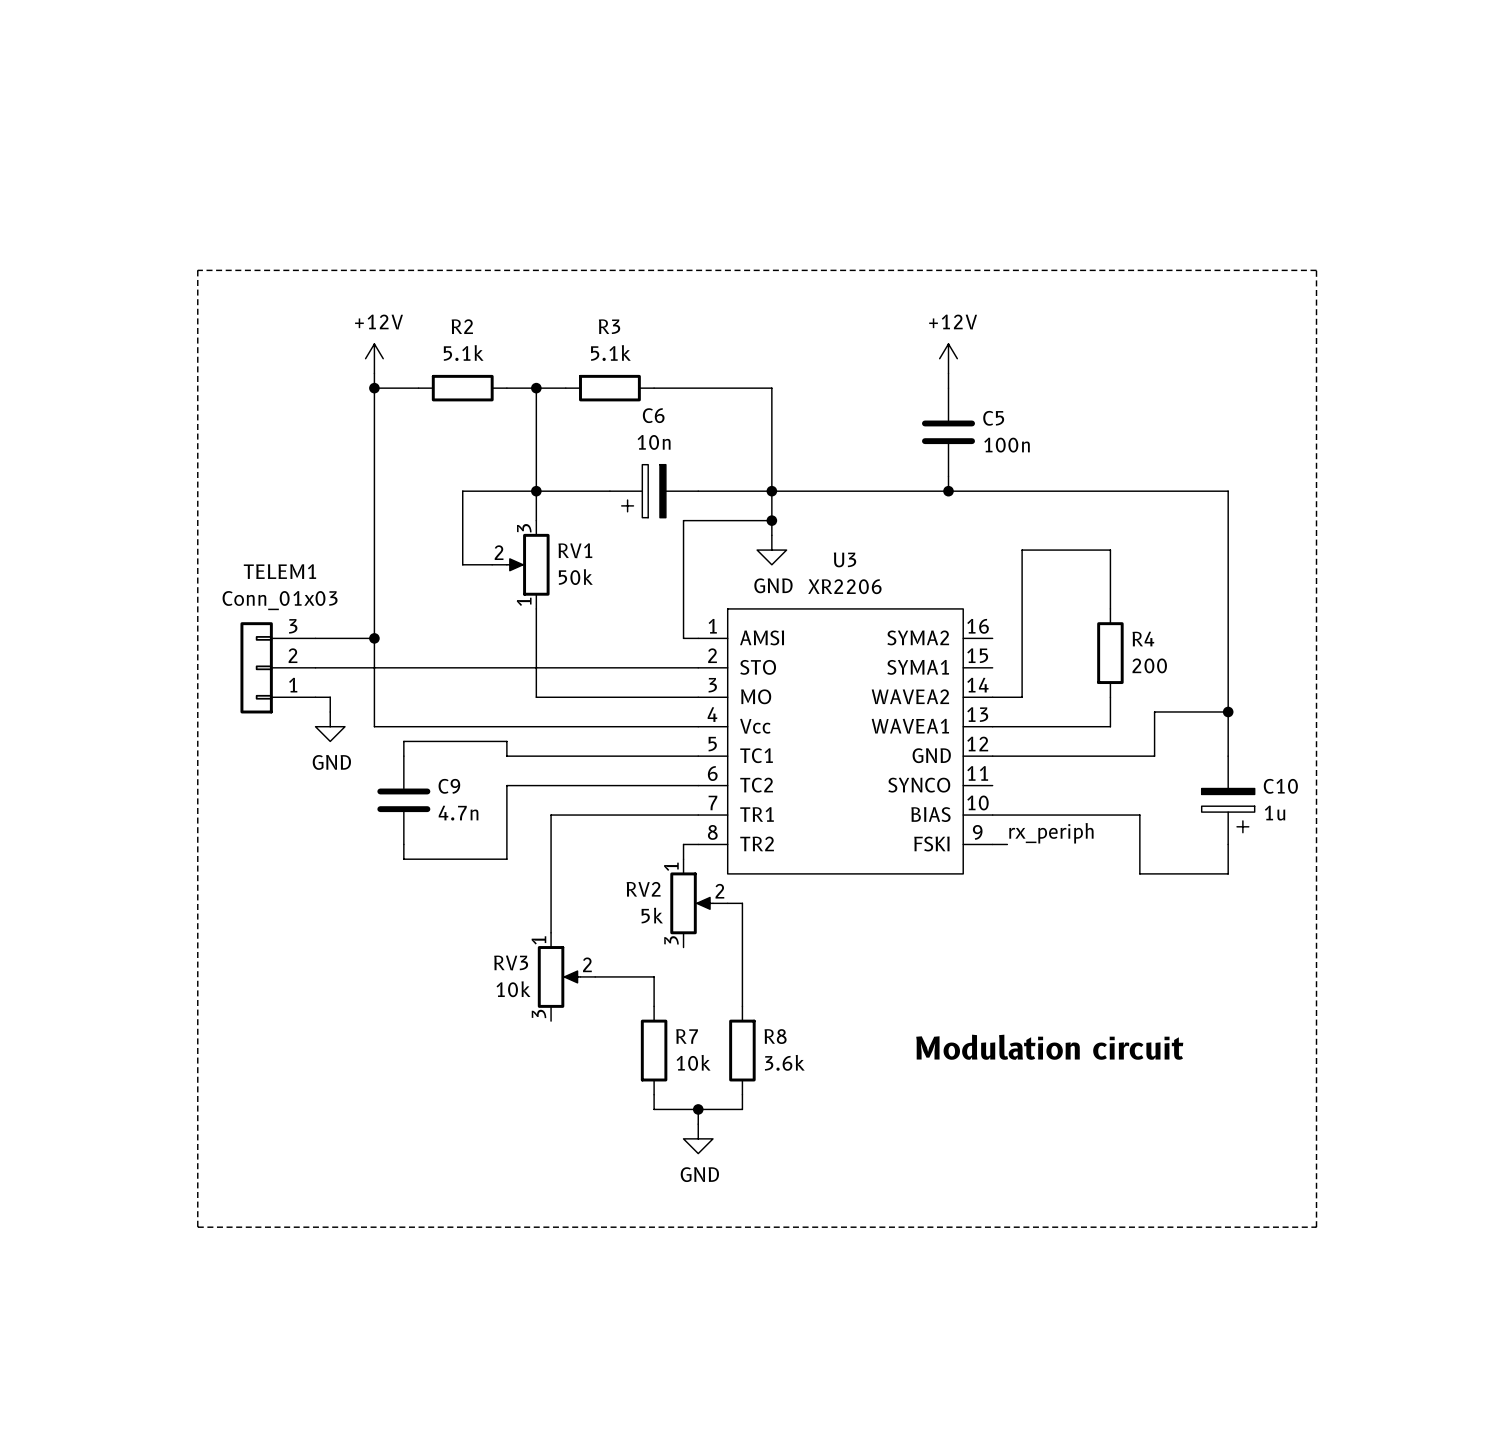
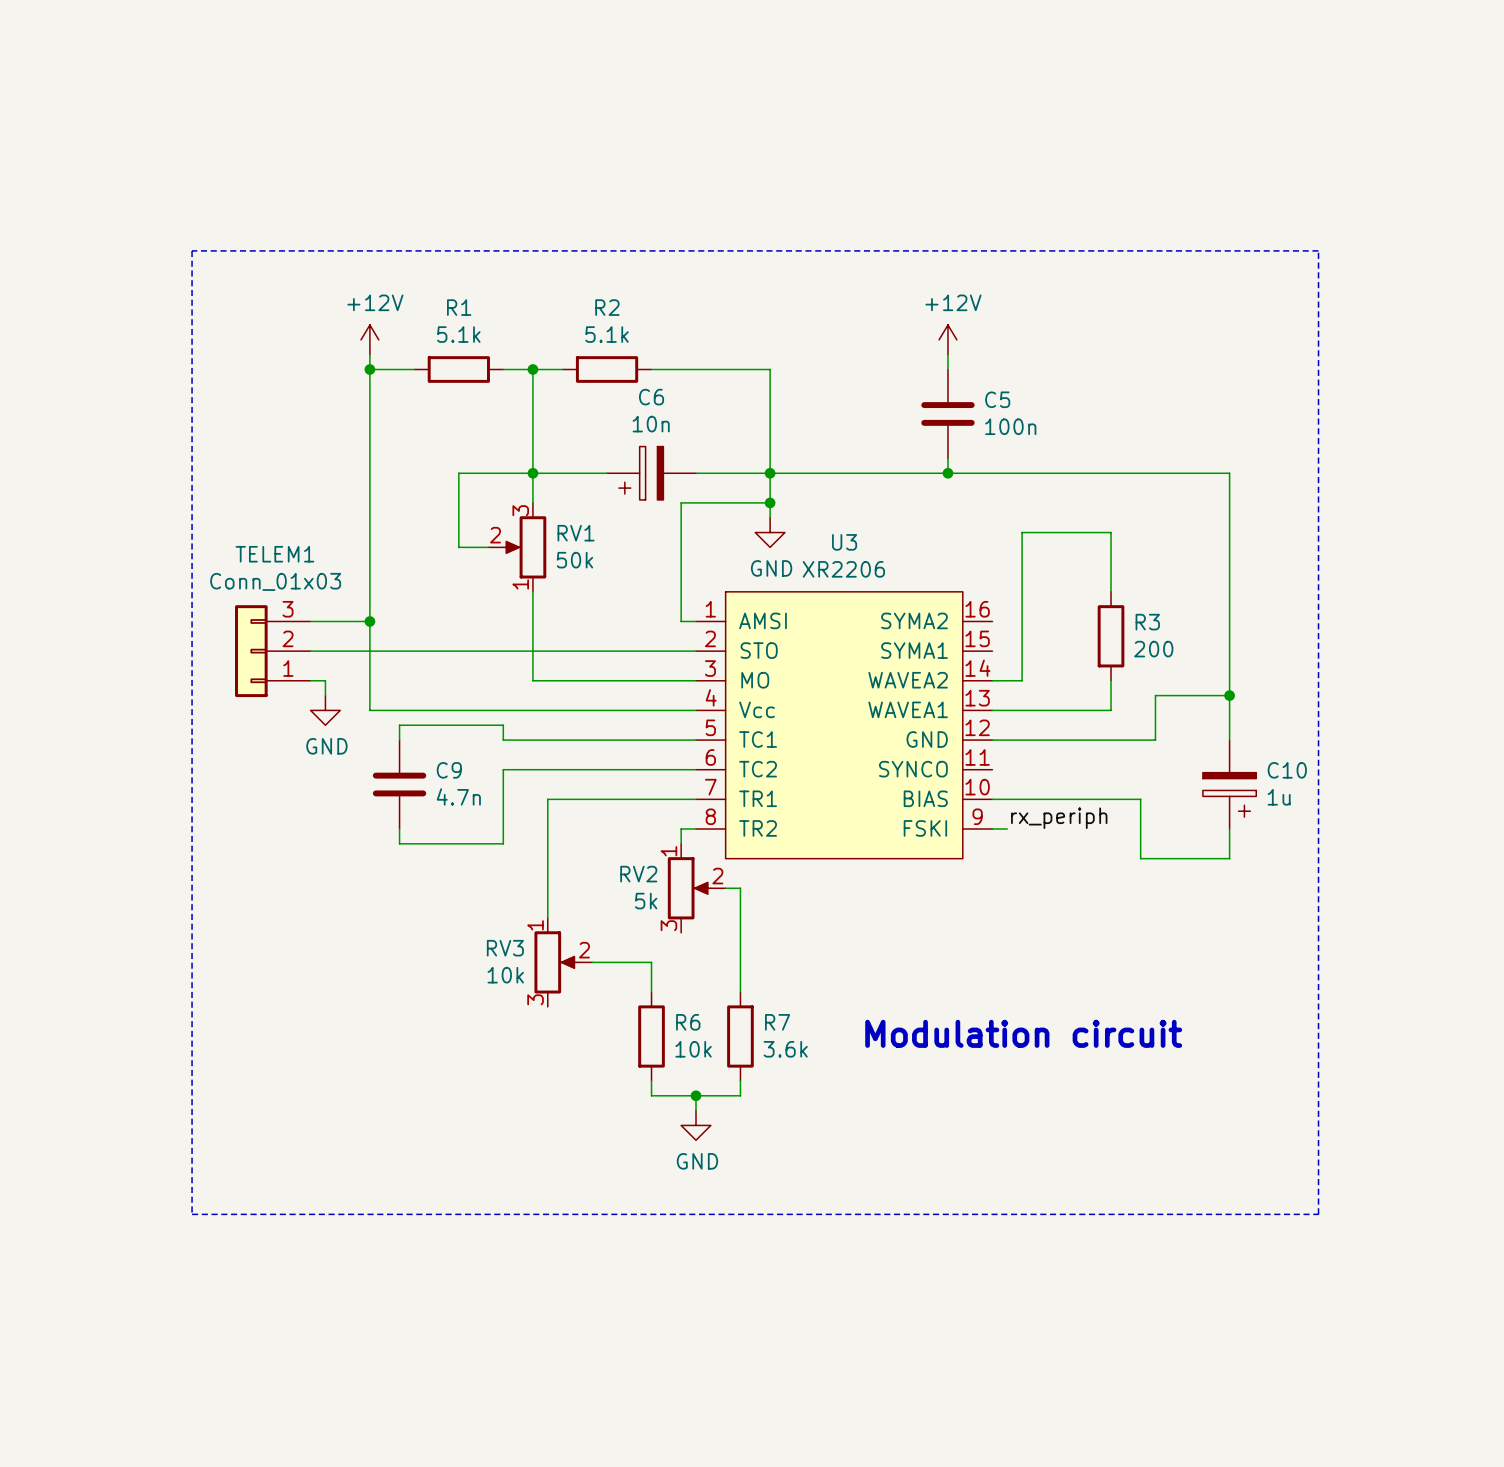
R2 name: R2 (462, 326) -> R1 (459, 307)
R3 name: R3 (609, 326) -> R2 (607, 307)
R4 name: R4 (1143, 639) -> R3 (1147, 622)
R7 name: R7 (687, 1036) -> R6 (688, 1022)
R8 name: R8 (775, 1036) -> R7 (777, 1022)

